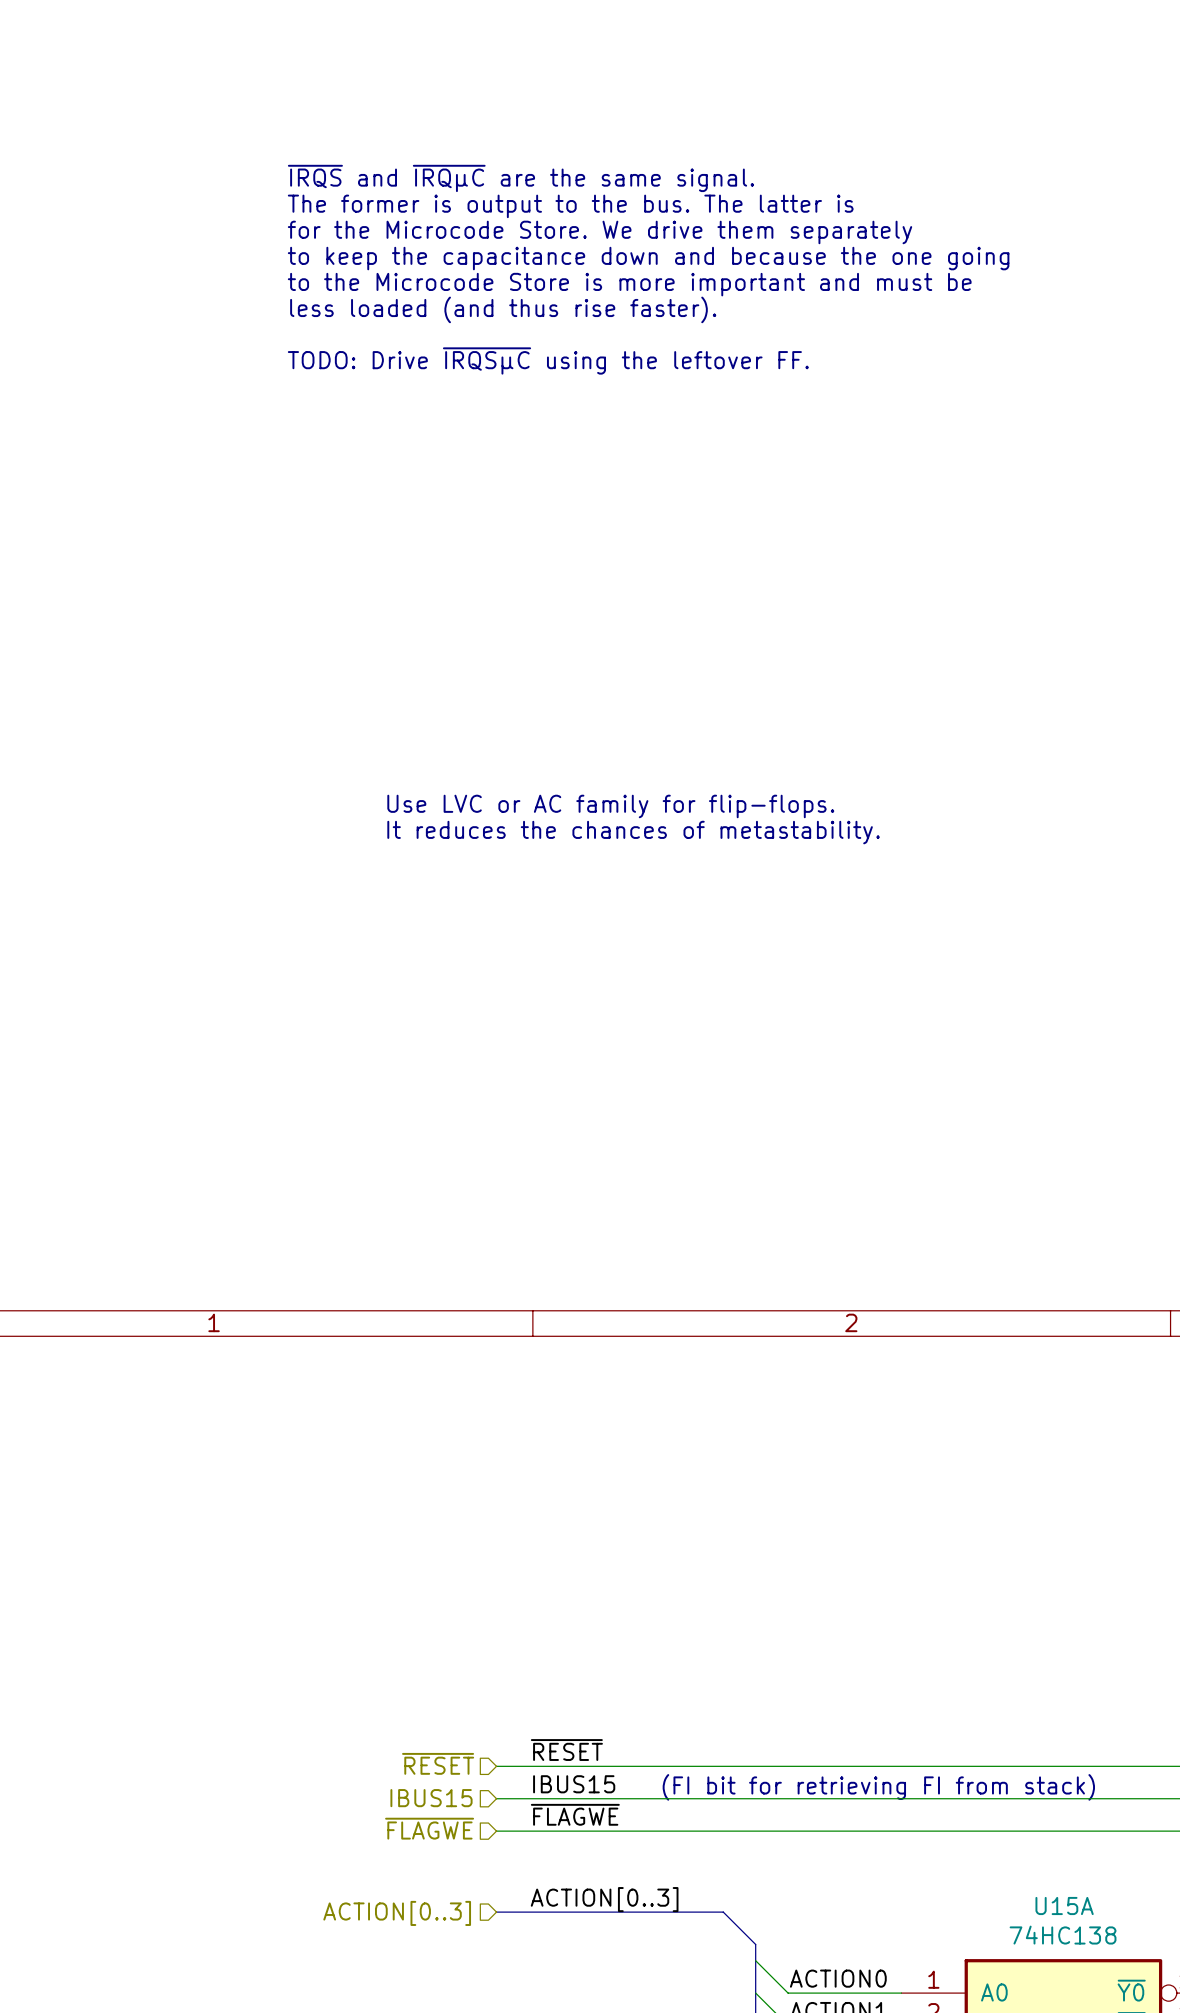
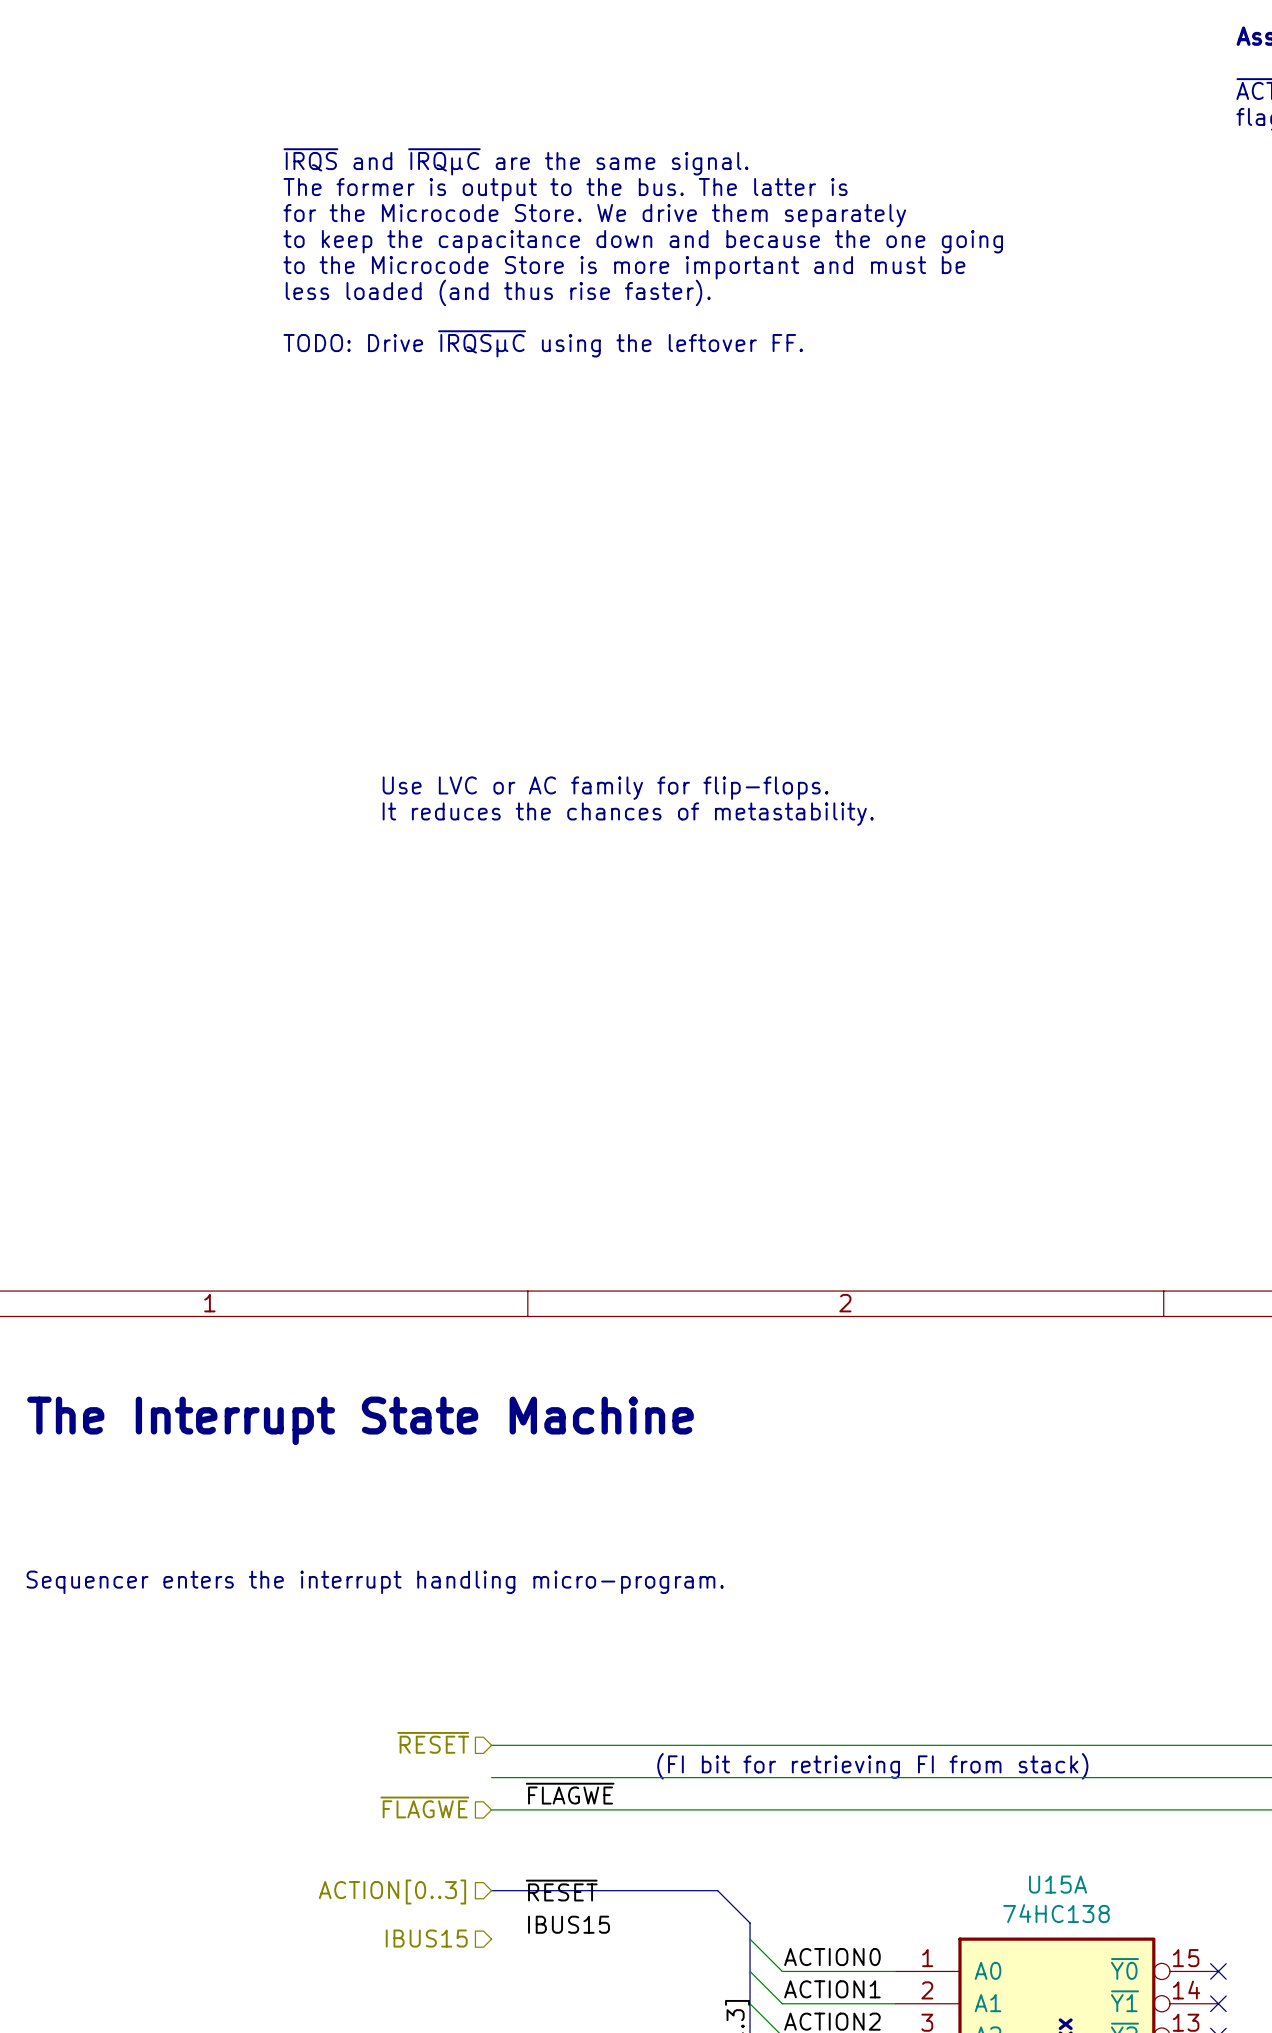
text: none -> The Interrupt State Machine (360, 1420)
text: none -> Sequencer enters the interrupt handling micro-program. (375, 1582)
label position: ~{RESET} (566, 1750) -> ~{RESET} (561, 1890)
label position: IBUS15 (574, 1784) -> IBUS15 (569, 1924)
hierarchical label position: IBUS15 (431, 1798) -> IBUS15 (426, 1938)
label: ACTION[0..3] (604, 1899) -> none

